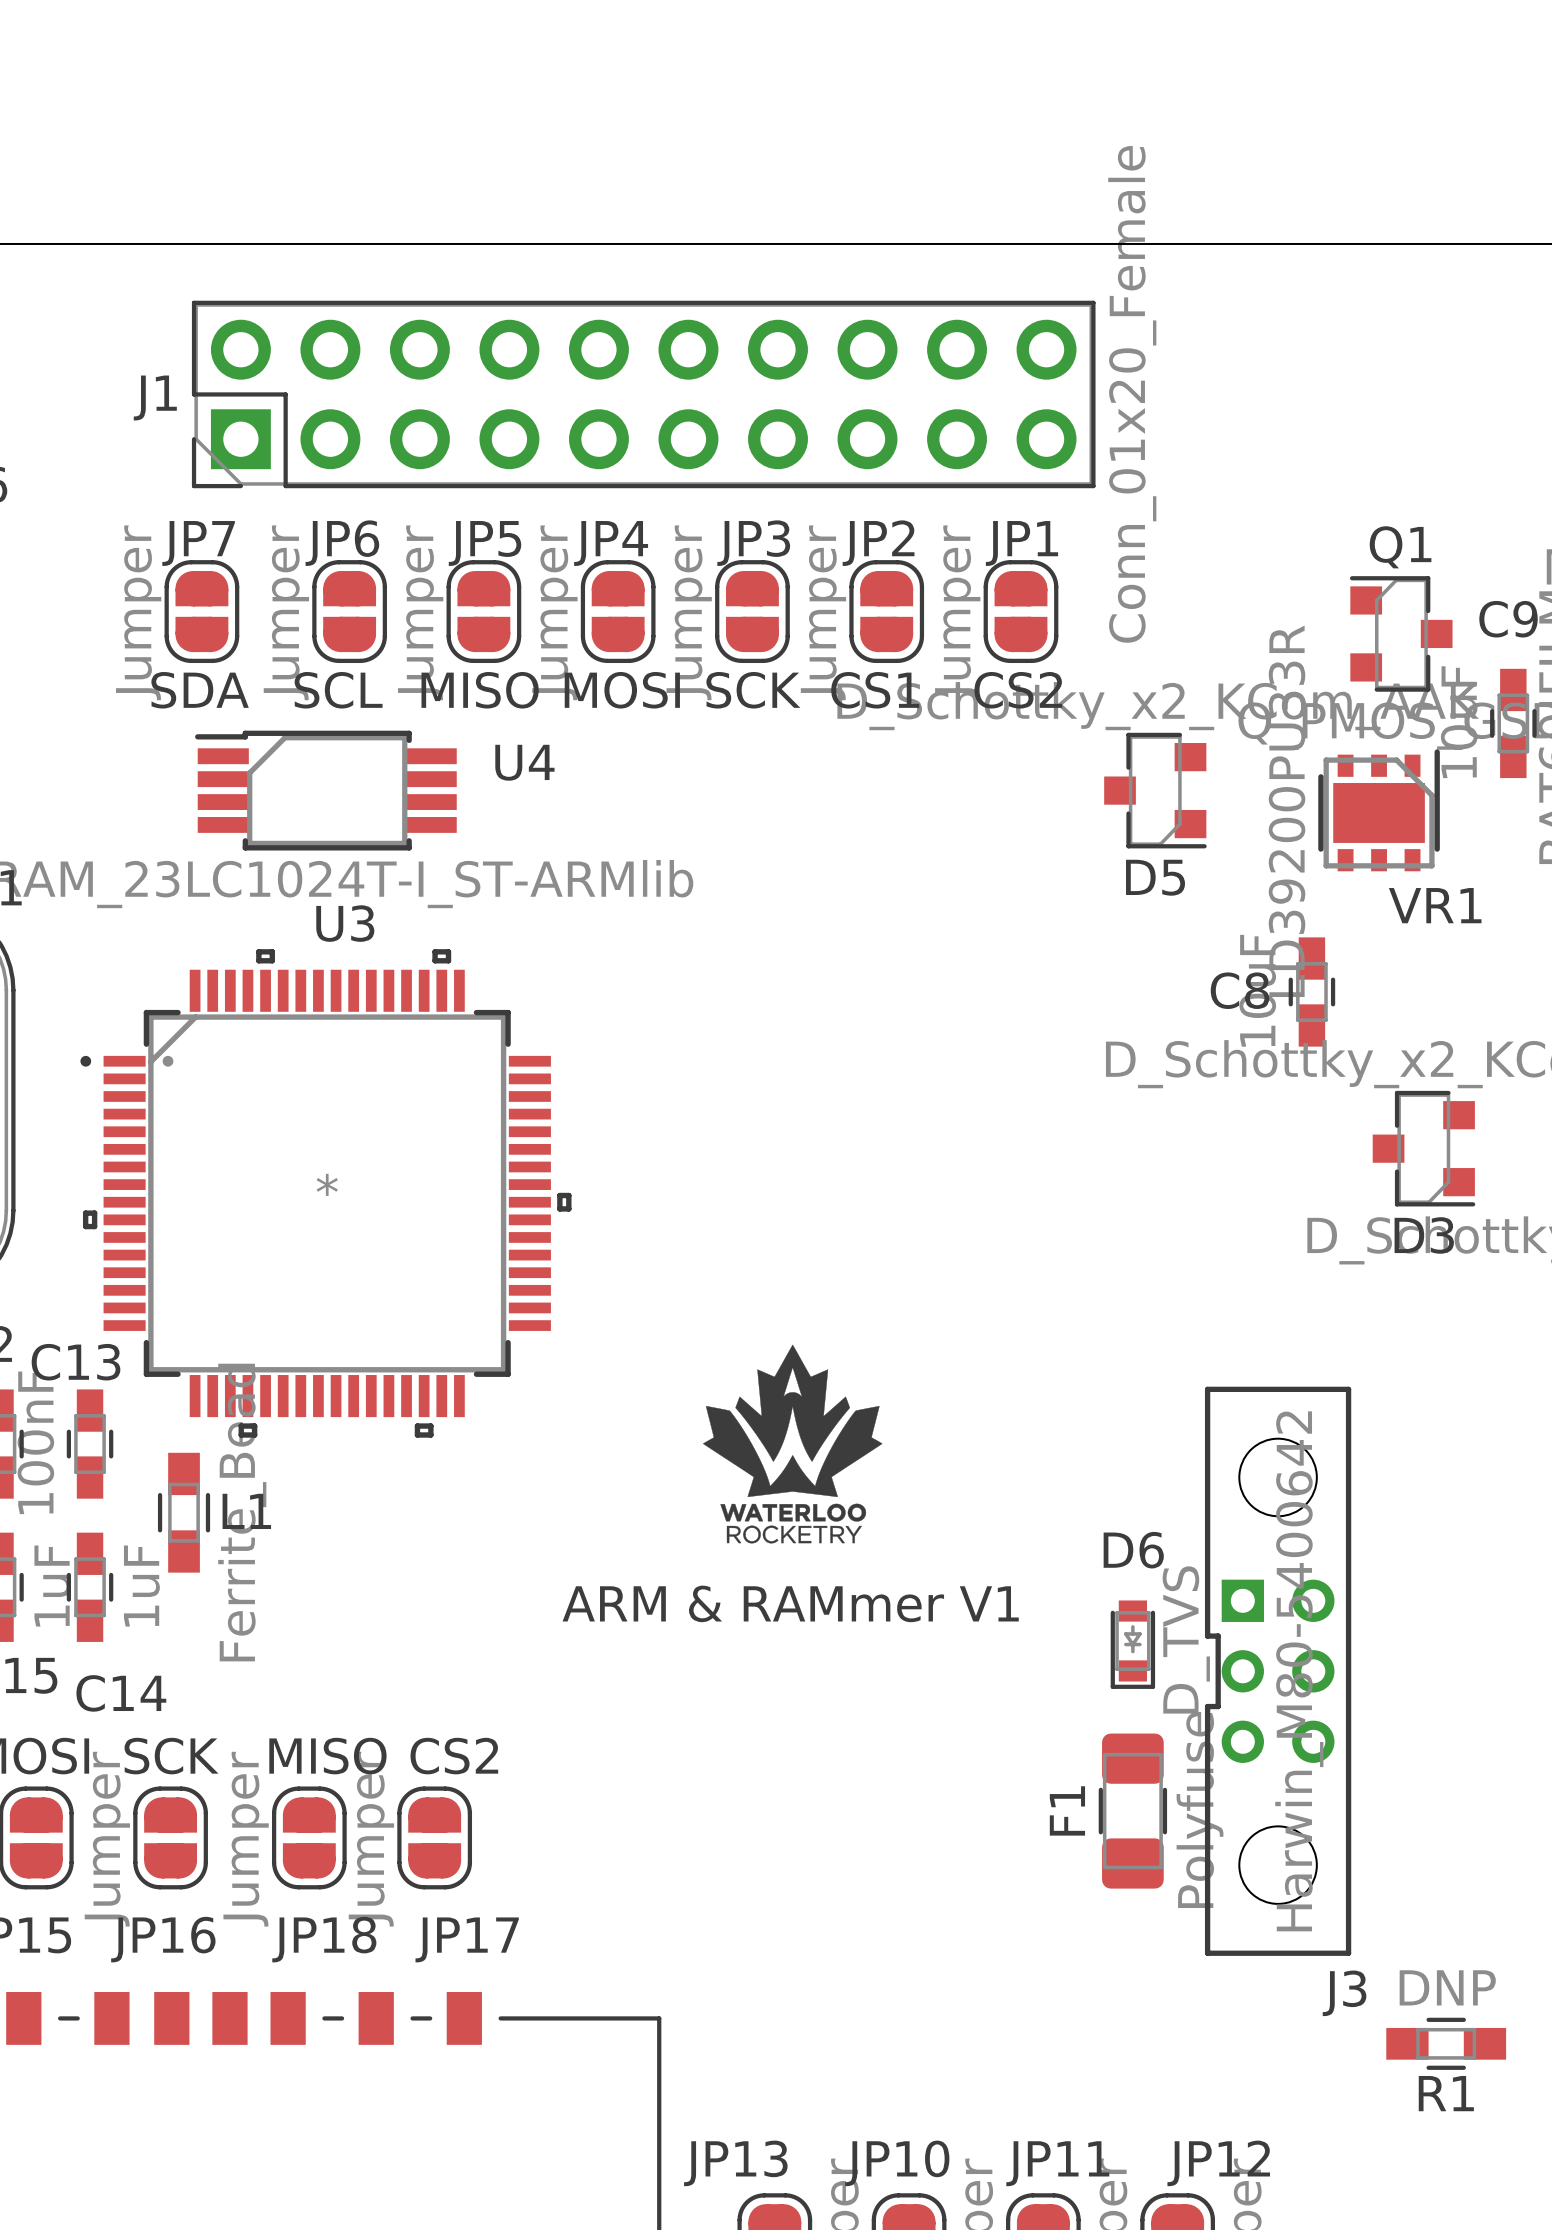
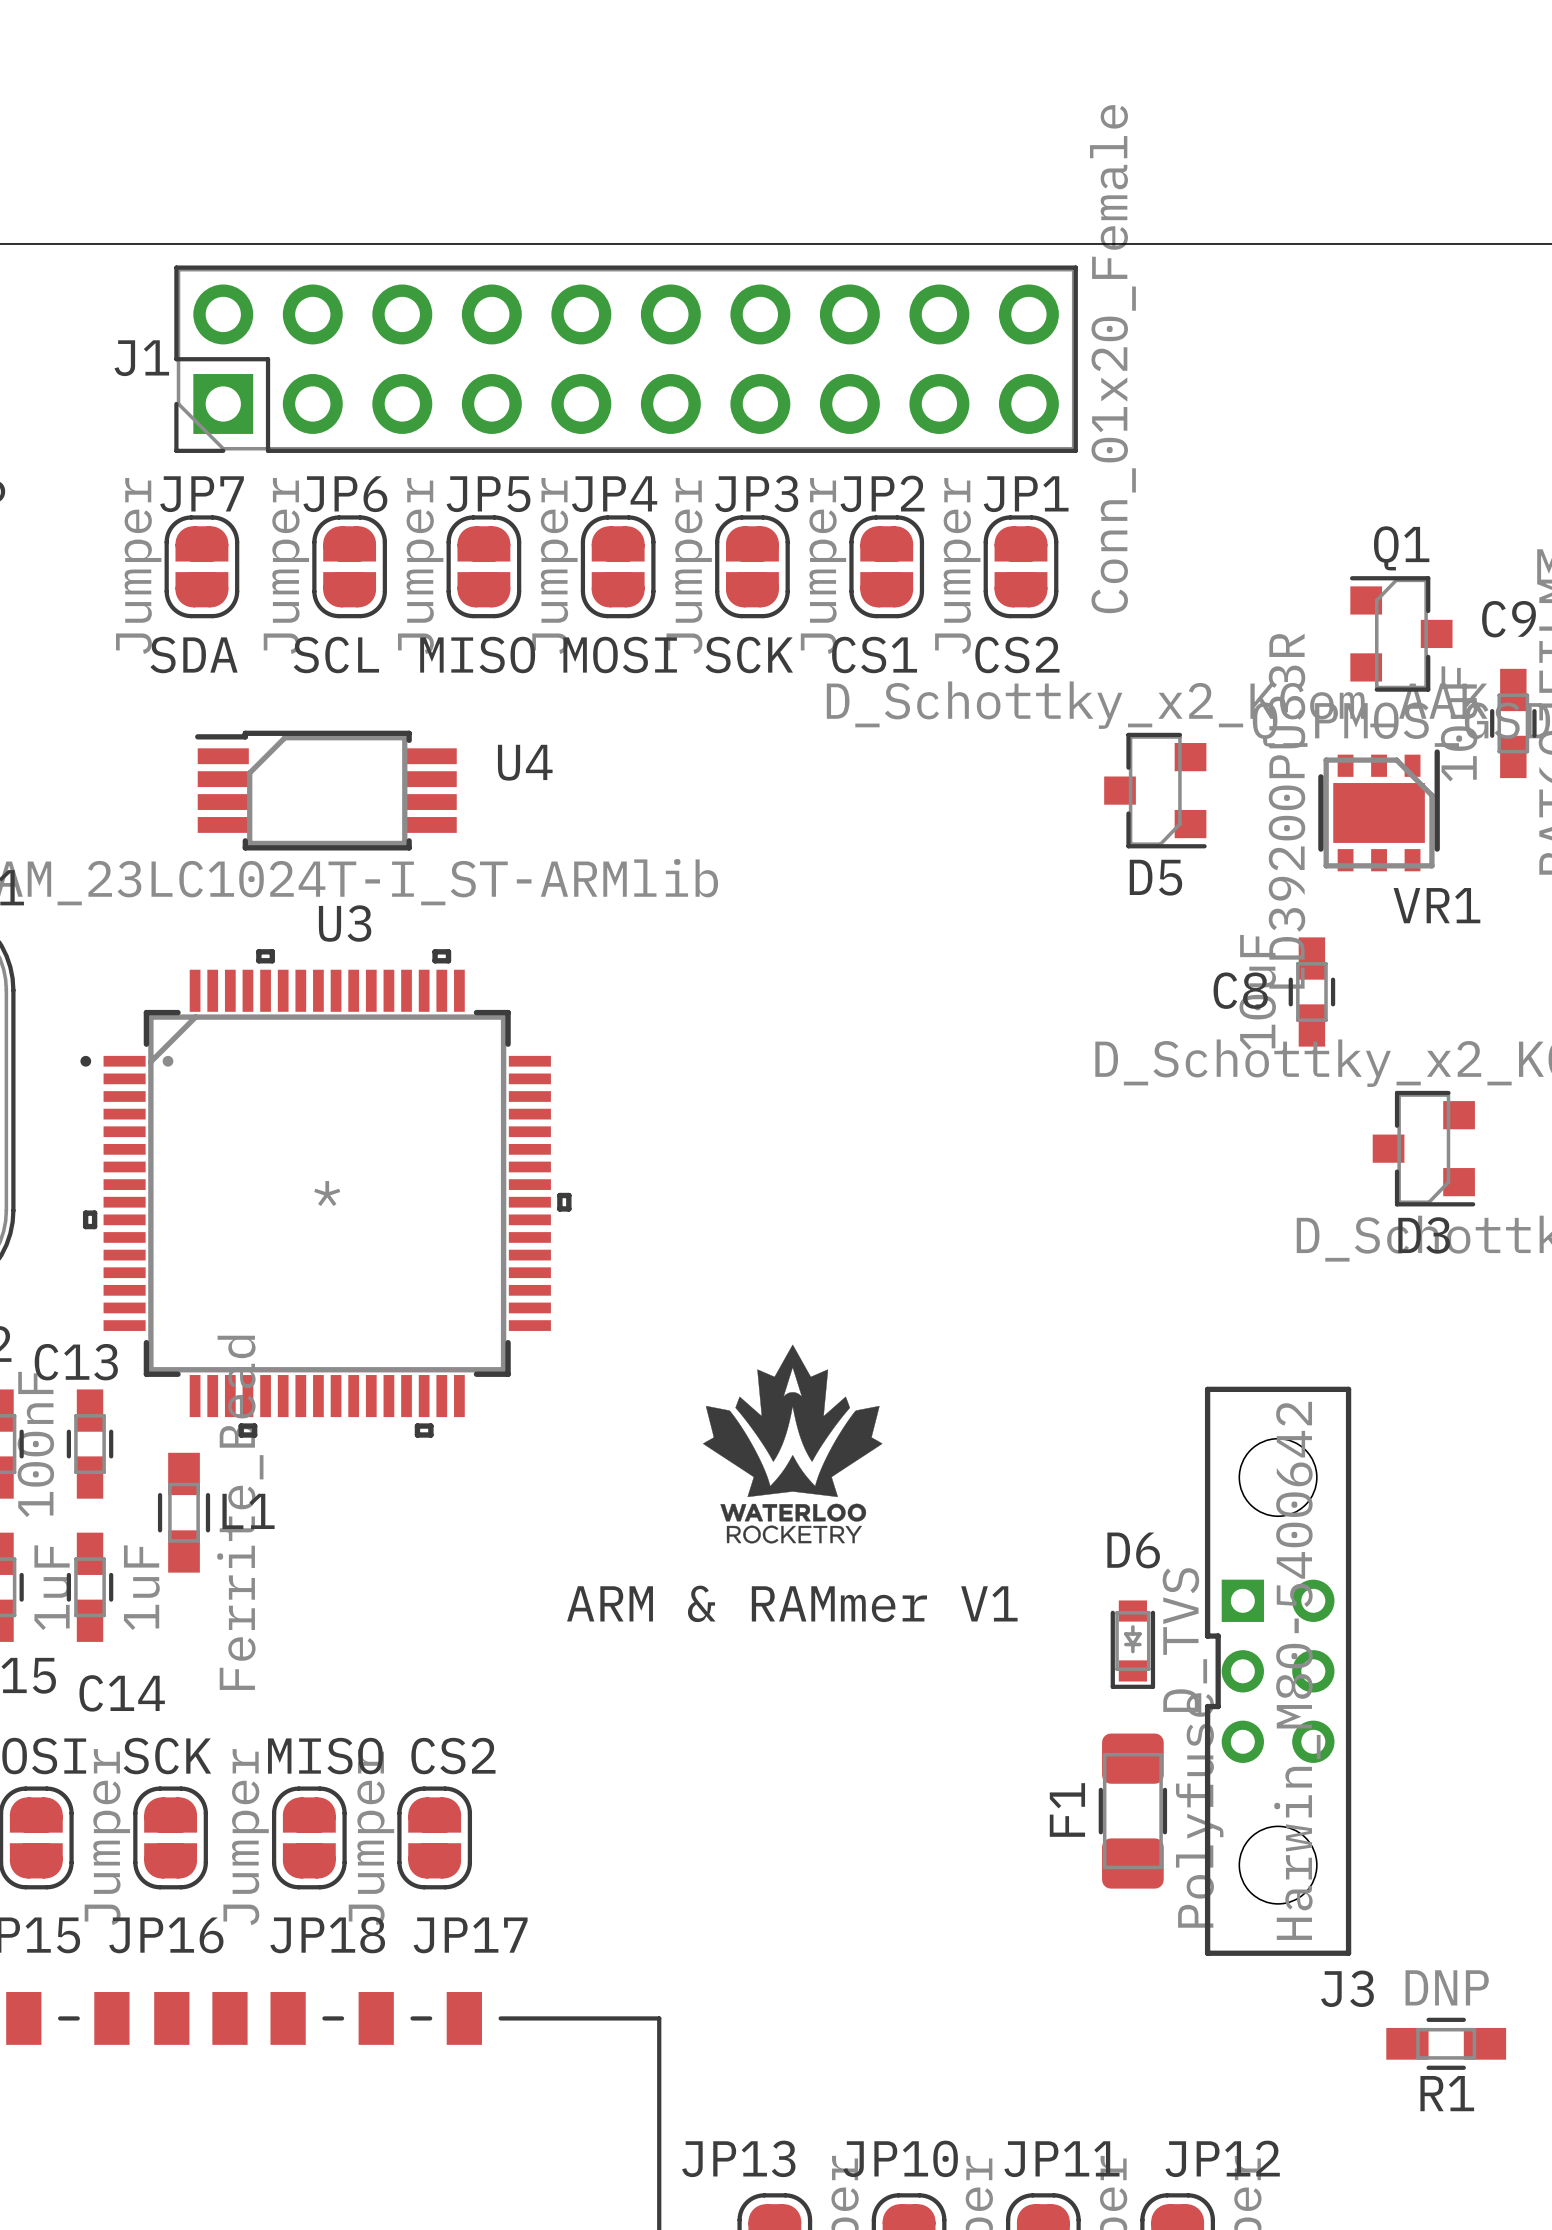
J1 position: (643, 394) -> (626, 359)
JP7 position: (201, 611) -> (201, 566)
JP6 position: (349, 611) -> (349, 566)
JP5 position: (483, 611) -> (483, 566)
JP4 position: (618, 611) -> (618, 566)
JP3 position: (752, 611) -> (752, 566)
JP2 position: (886, 611) -> (886, 566)
JP1 position: (1020, 611) -> (1020, 566)
text position: SDA (200, 690) -> SDA (194, 655)
text position: SCL (338, 690) -> SCL (336, 655)
text position: MISO (480, 690) -> MISO (477, 655)
text position: MOSI (622, 690) -> MOSI (620, 655)
text position: SCK (753, 690) -> SCK (749, 655)
text position: CS1 (875, 690) -> CS1 (874, 655)
text position: CS2 (1018, 690) -> CS2 (1017, 655)

